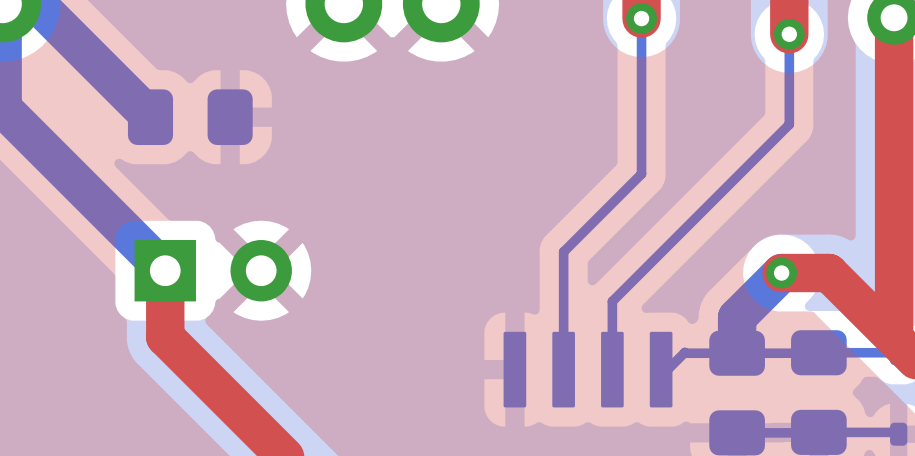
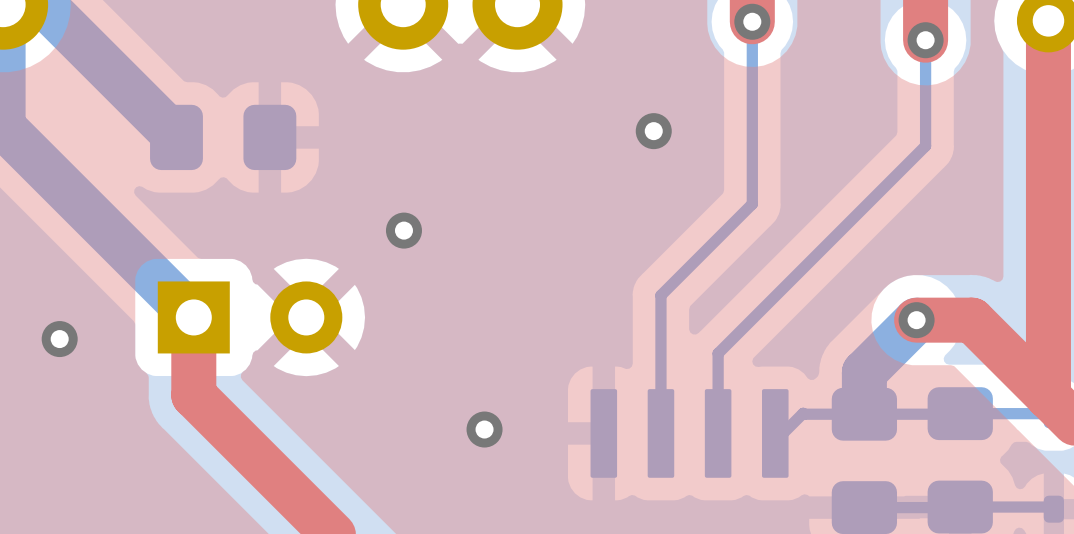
via: none -> (653, 131)
via: none -> (403, 230)
via: none -> (59, 339)
via: none -> (484, 429)

